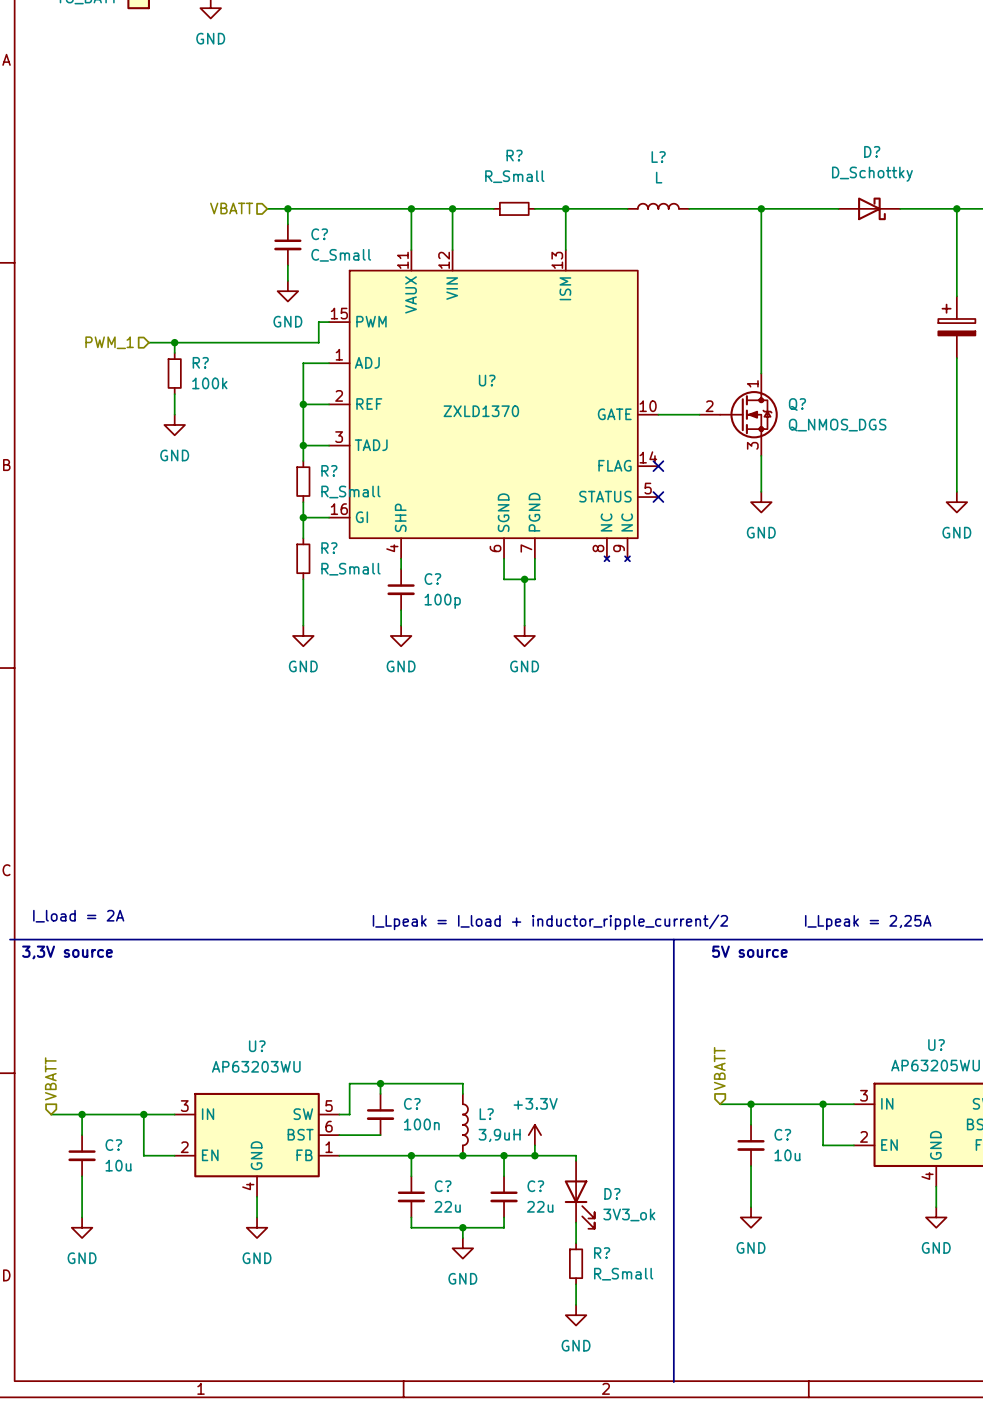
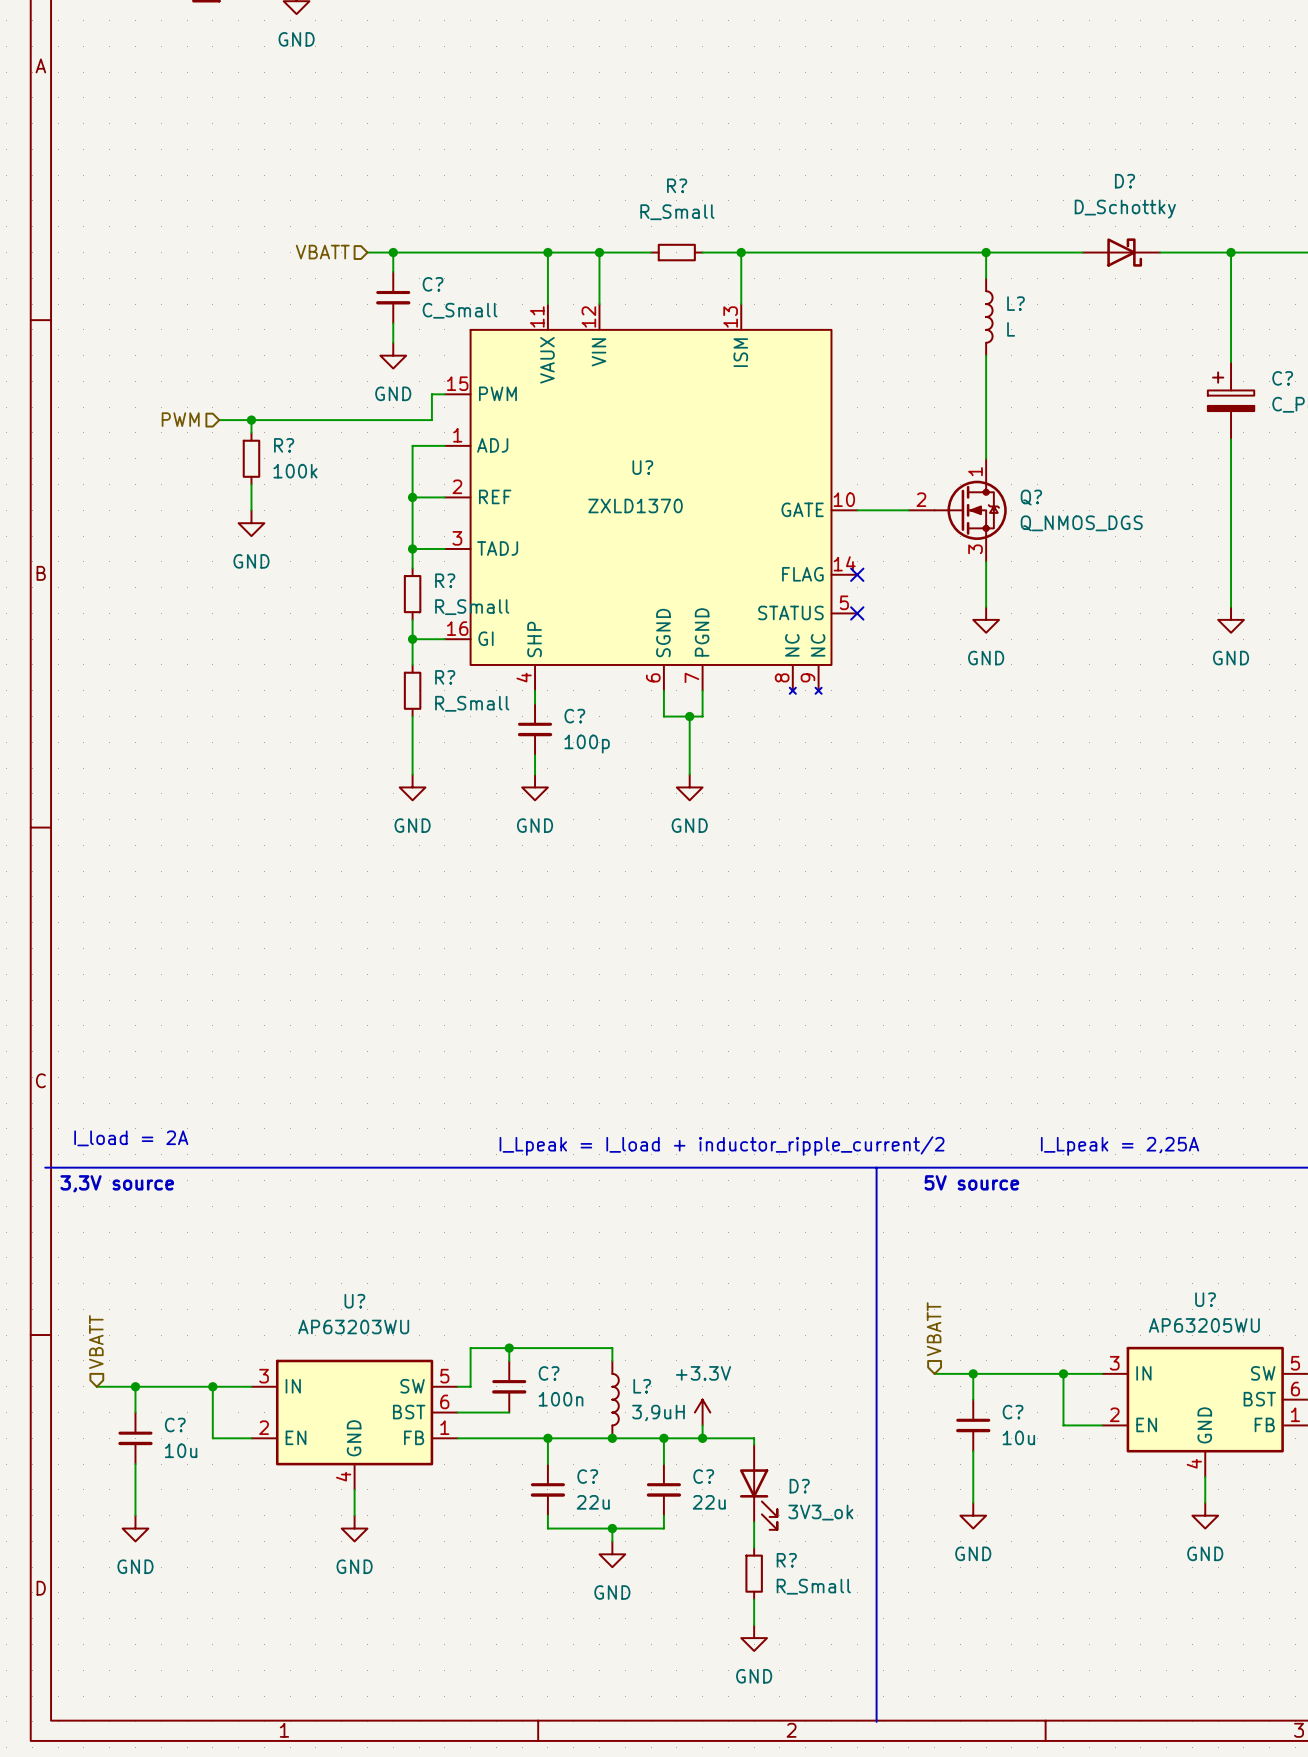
L? name position: L? (658, 157) -> L? (1015, 303)
L? rotation: 0° (658, 206) -> 90° clockwise (989, 316)
L? position: (658, 206) -> (989, 316)
wire: none -> (818, 252) (895, 252)
wire: (761, 229) (761, 291) -> none
hierarchical label: PWM_1 (109, 342) -> PWM (180, 419)

